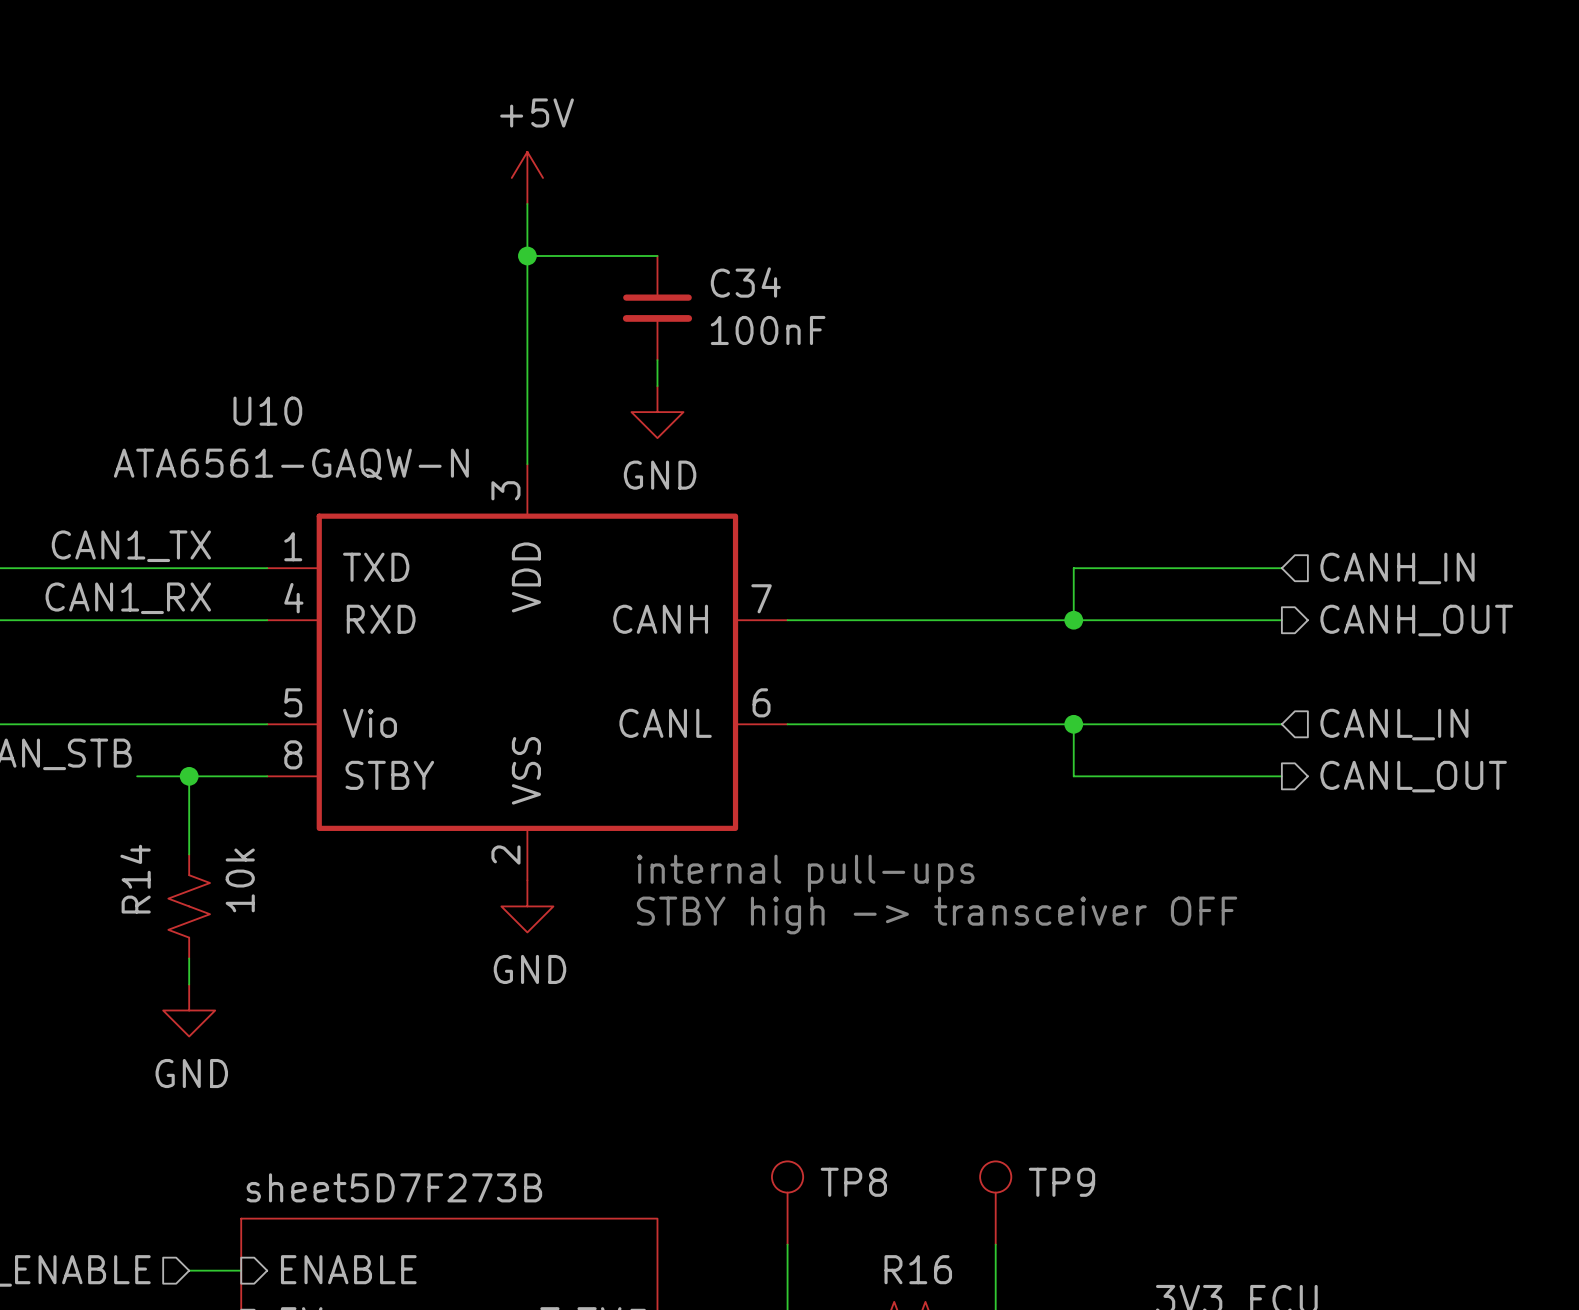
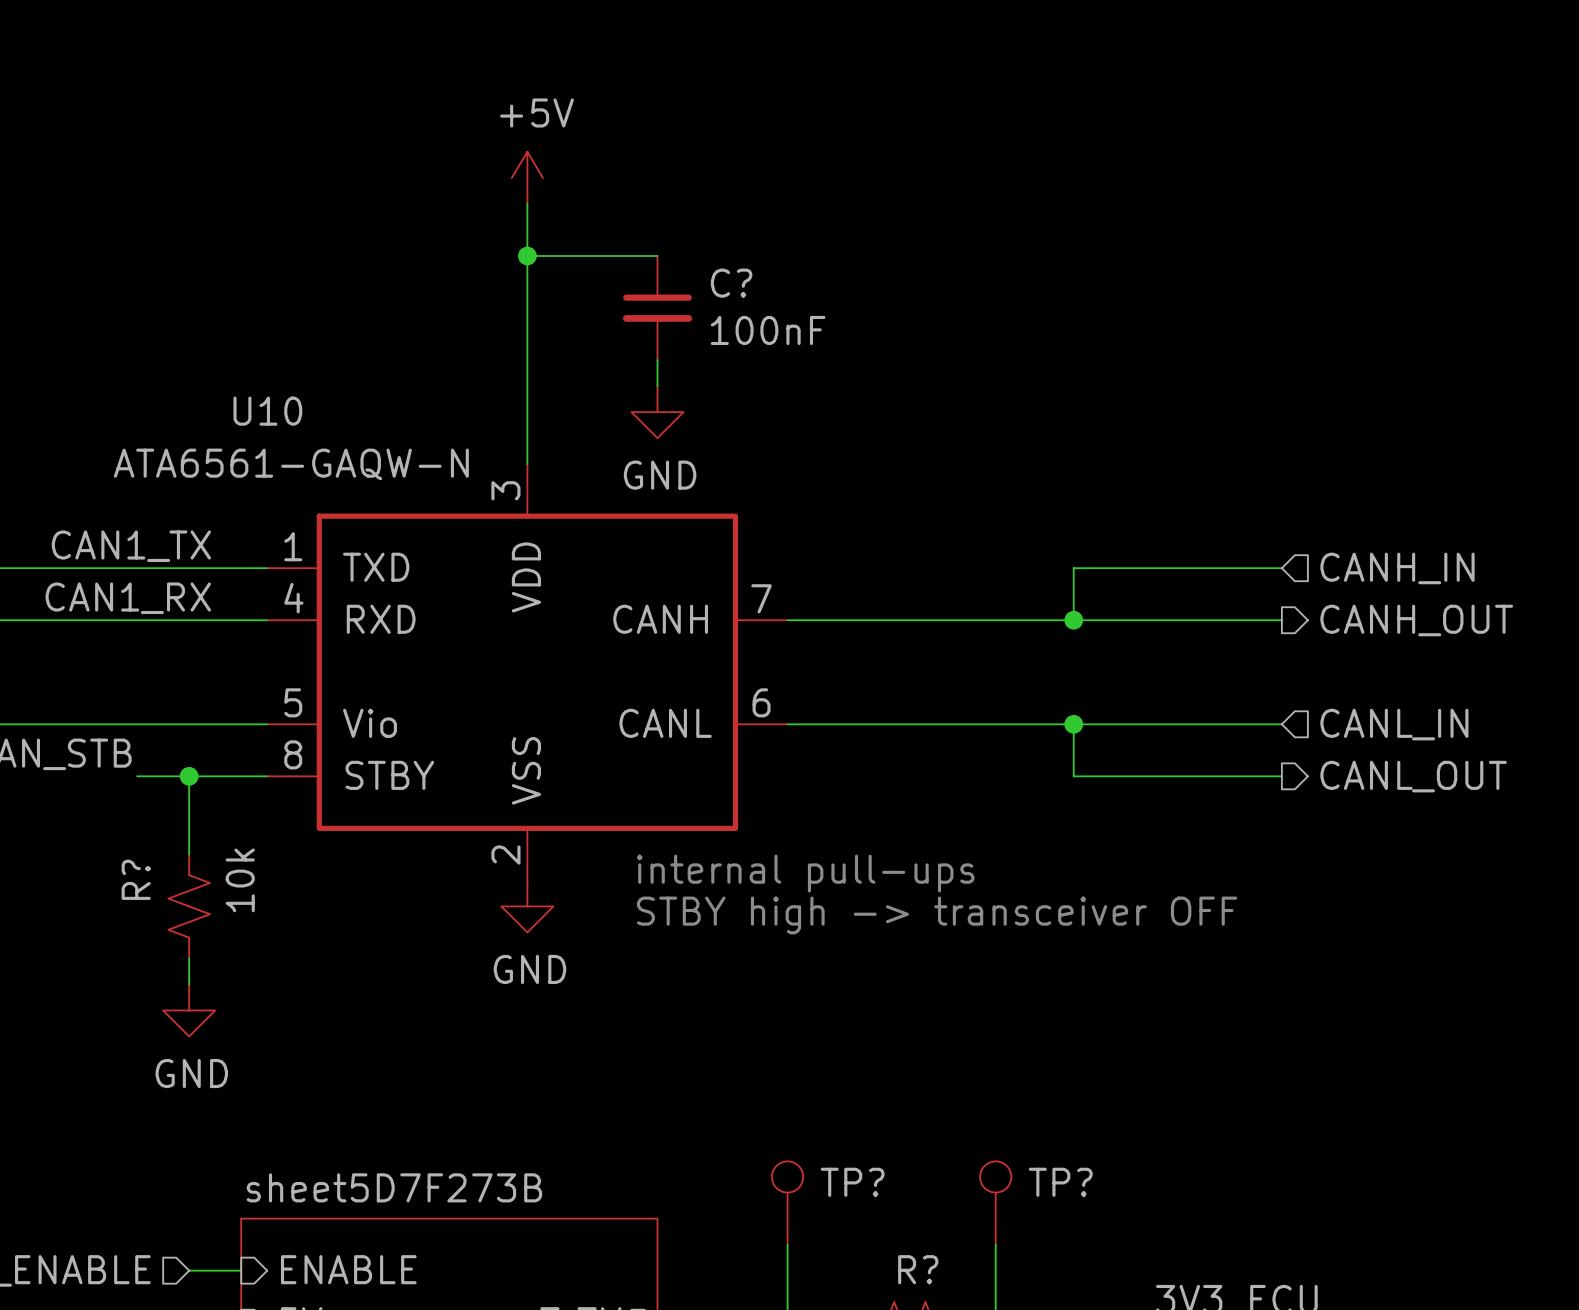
C34 name: C34 (745, 282) -> C? (731, 283)
R14 name: R14 (135, 879) -> R? (136, 879)
TP8 name: TP8 (853, 1182) -> TP? (852, 1182)
TP9 name: TP9 (1062, 1182) -> TP? (1060, 1182)
R16 name: R16 (918, 1269) -> R? (918, 1269)

